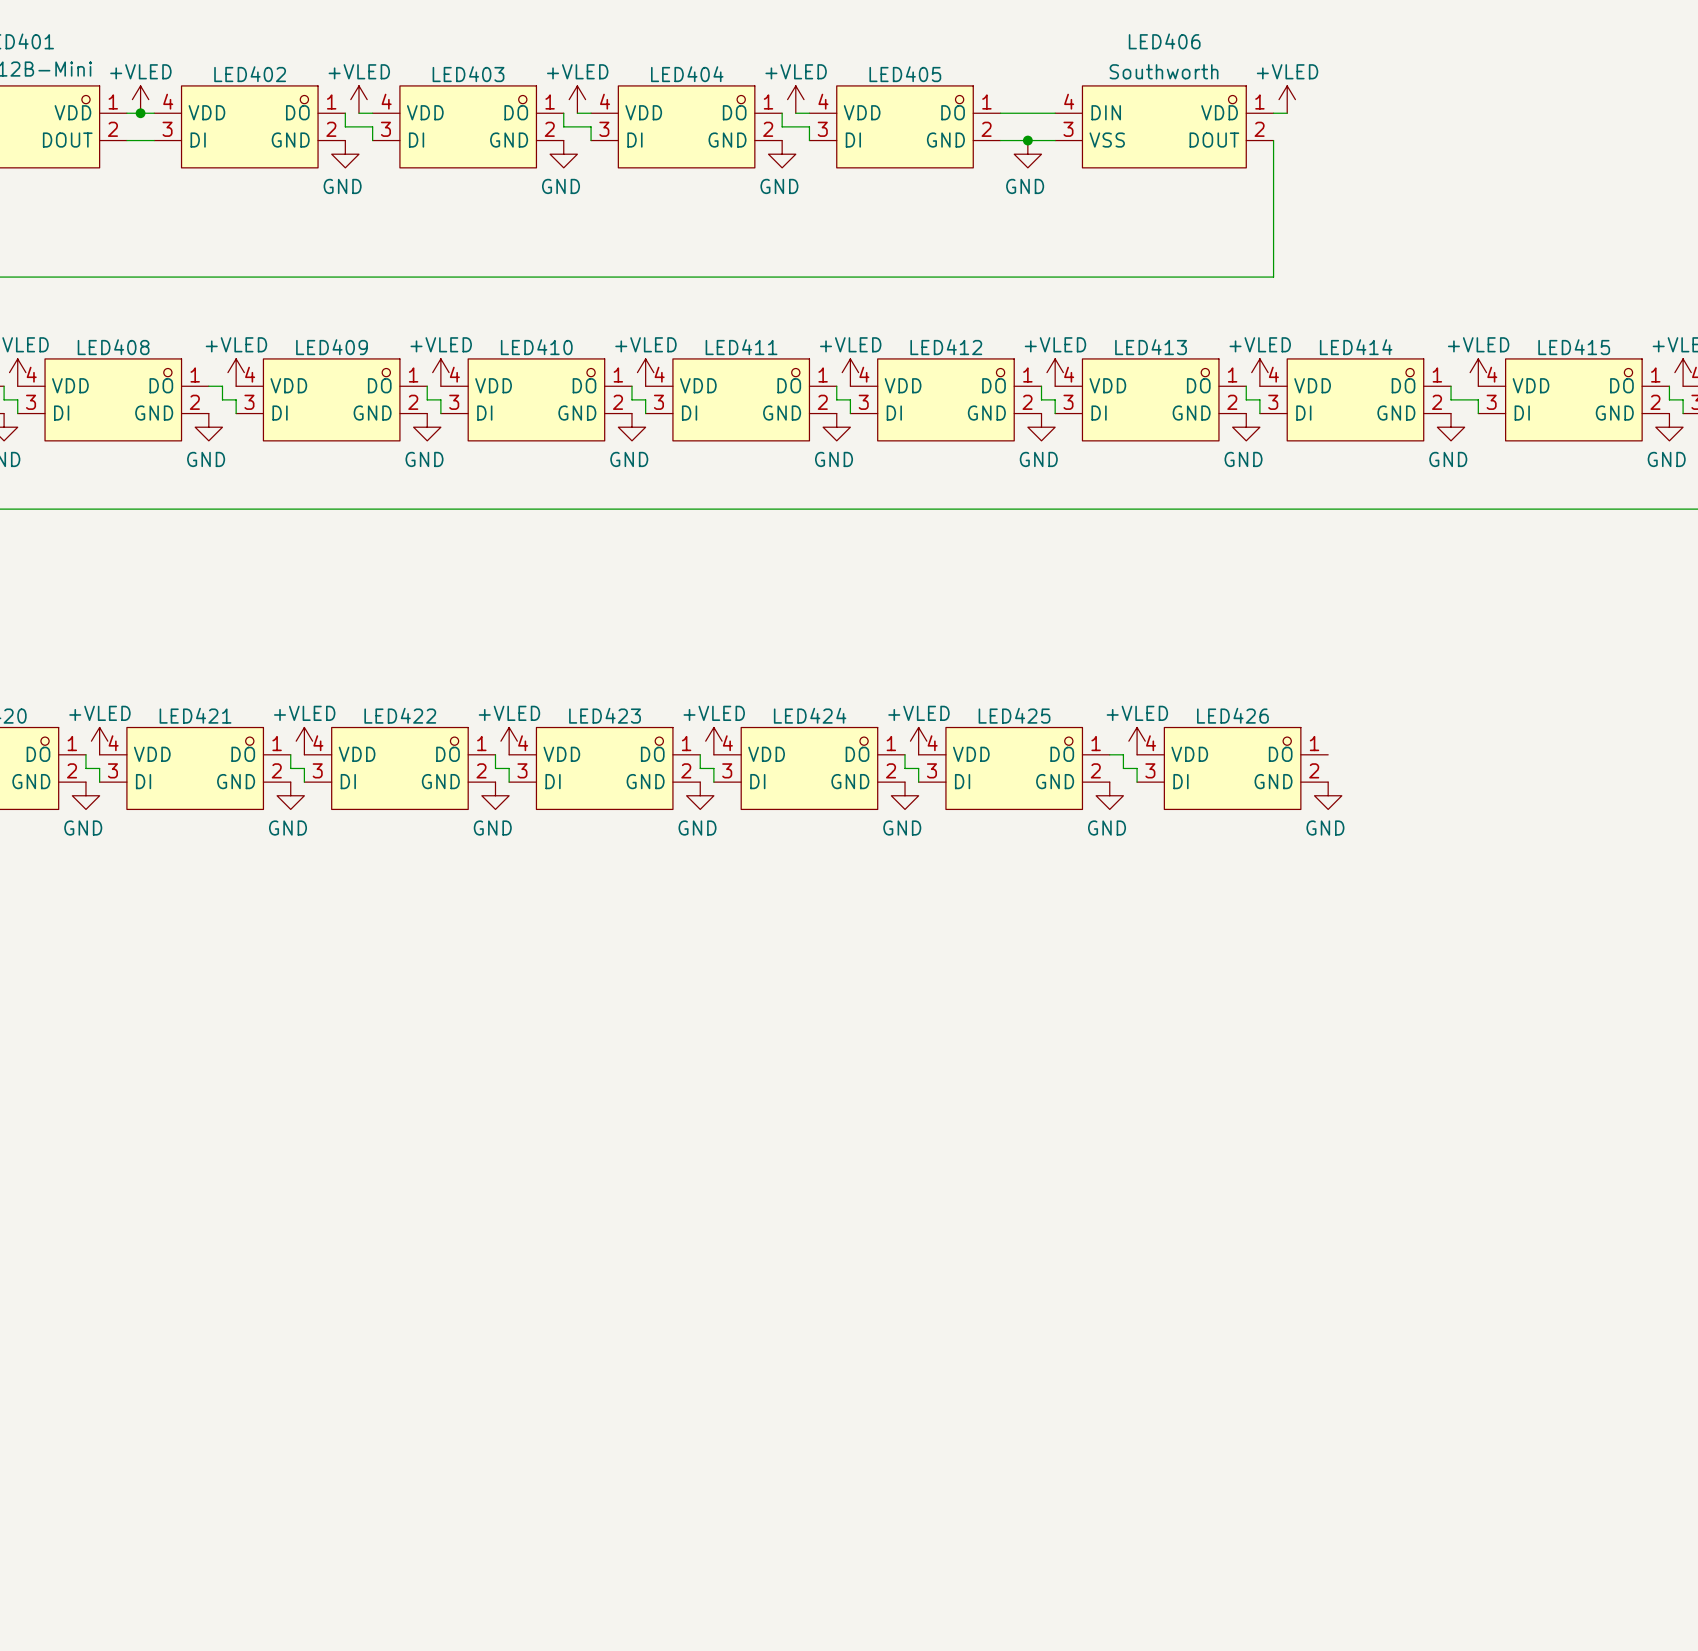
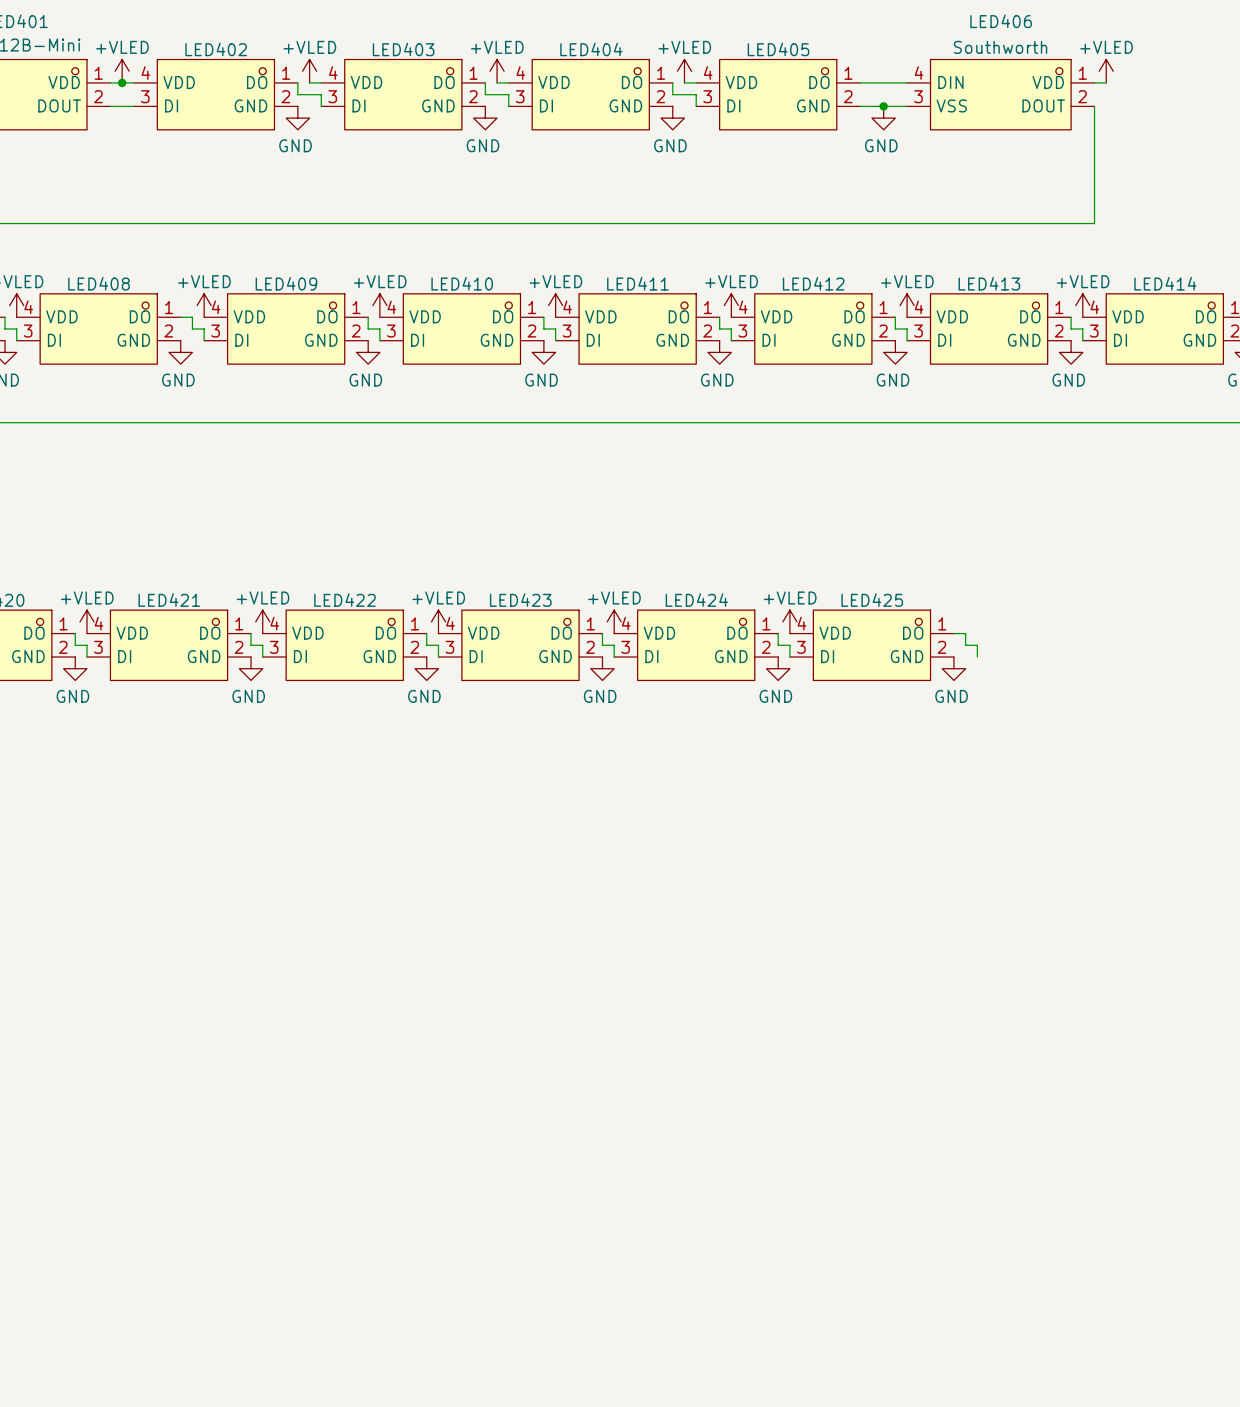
power symbol: +VLED (1137, 741) -> none
LED426: (1232, 768) -> none
power symbol: GND (1328, 795) -> none

